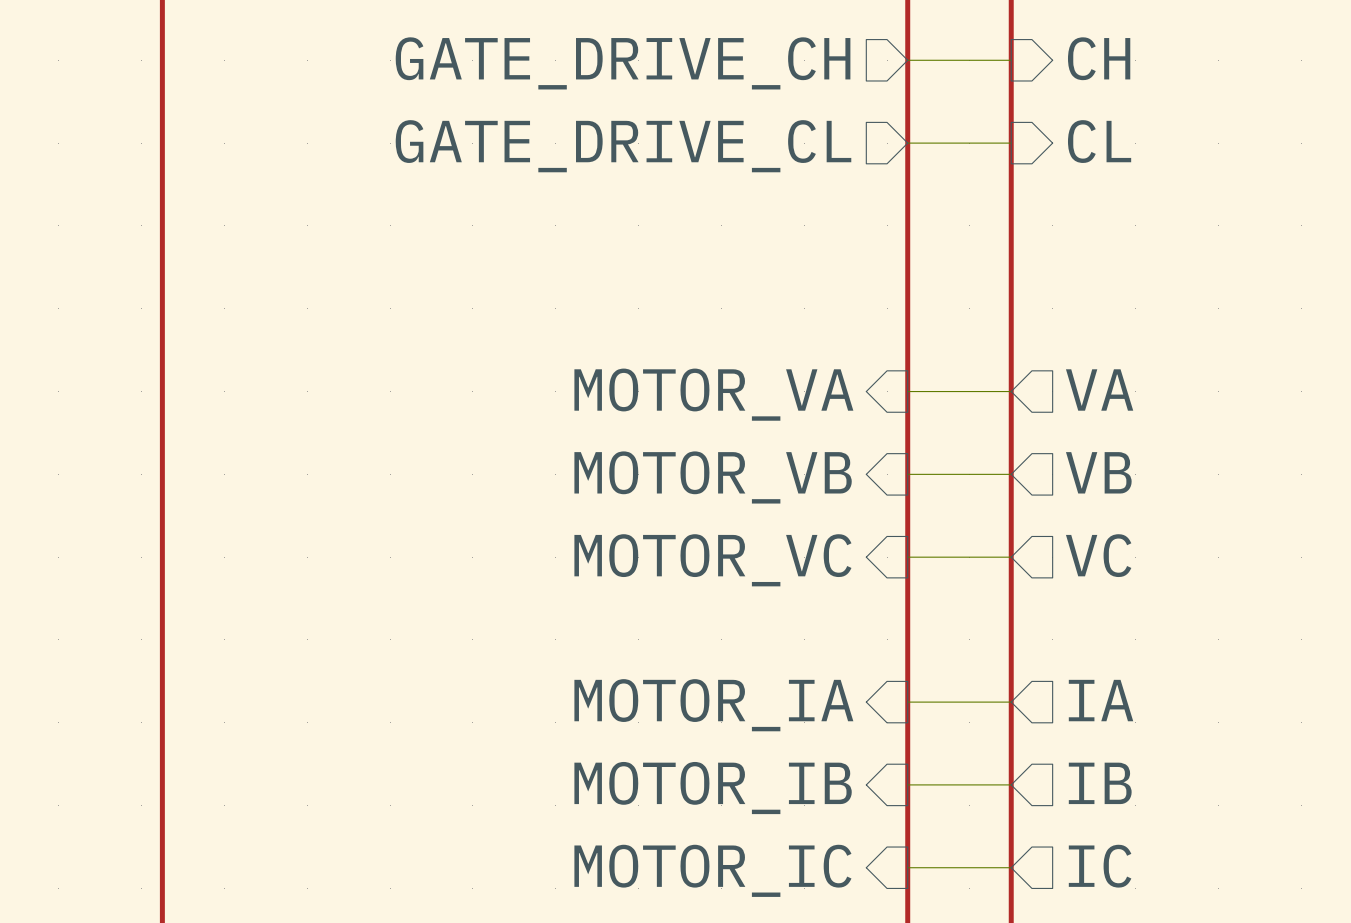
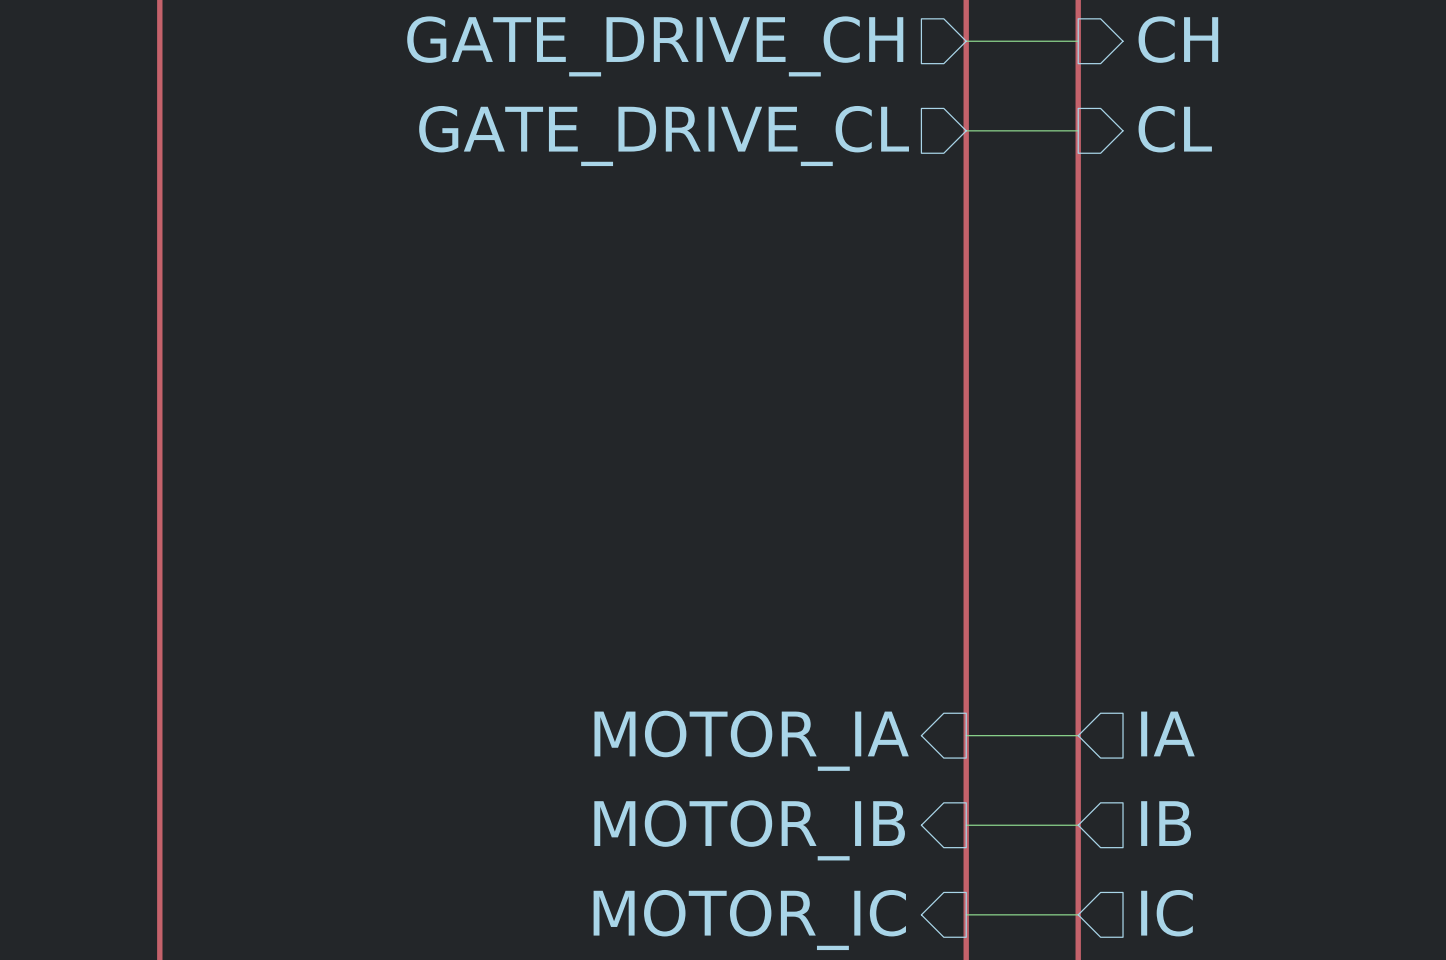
sheet pin: VA (1099, 389) -> none
wire: (907, 391) (1011, 391) -> none
sheet pin: MOTOR_VA (713, 394) -> none
sheet pin: VB (1098, 472) -> none
wire: (907, 474) (1011, 474) -> none
sheet pin: MOTOR_VB (713, 477) -> none
sheet pin: VC (1098, 555) -> none
wire: (907, 557) (1011, 557) -> none
sheet pin: MOTOR_VC (712, 560) -> none

